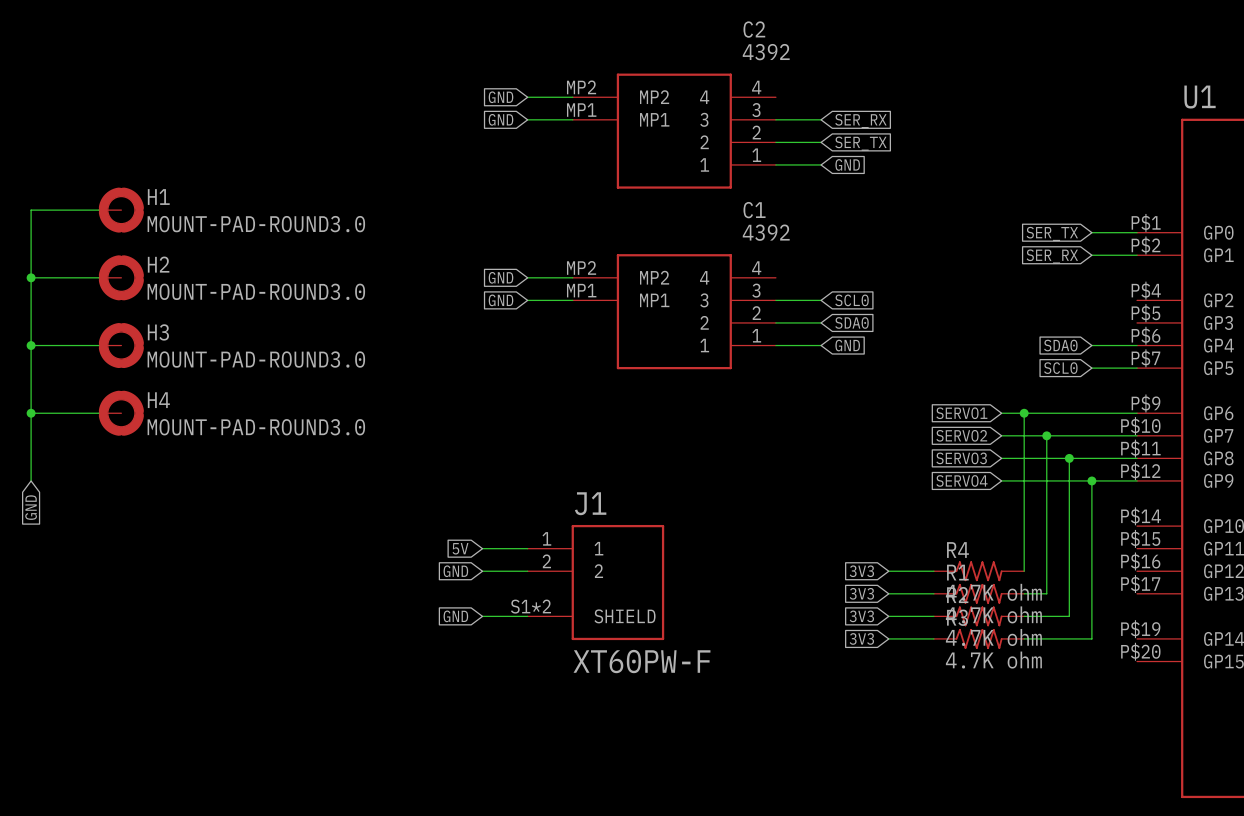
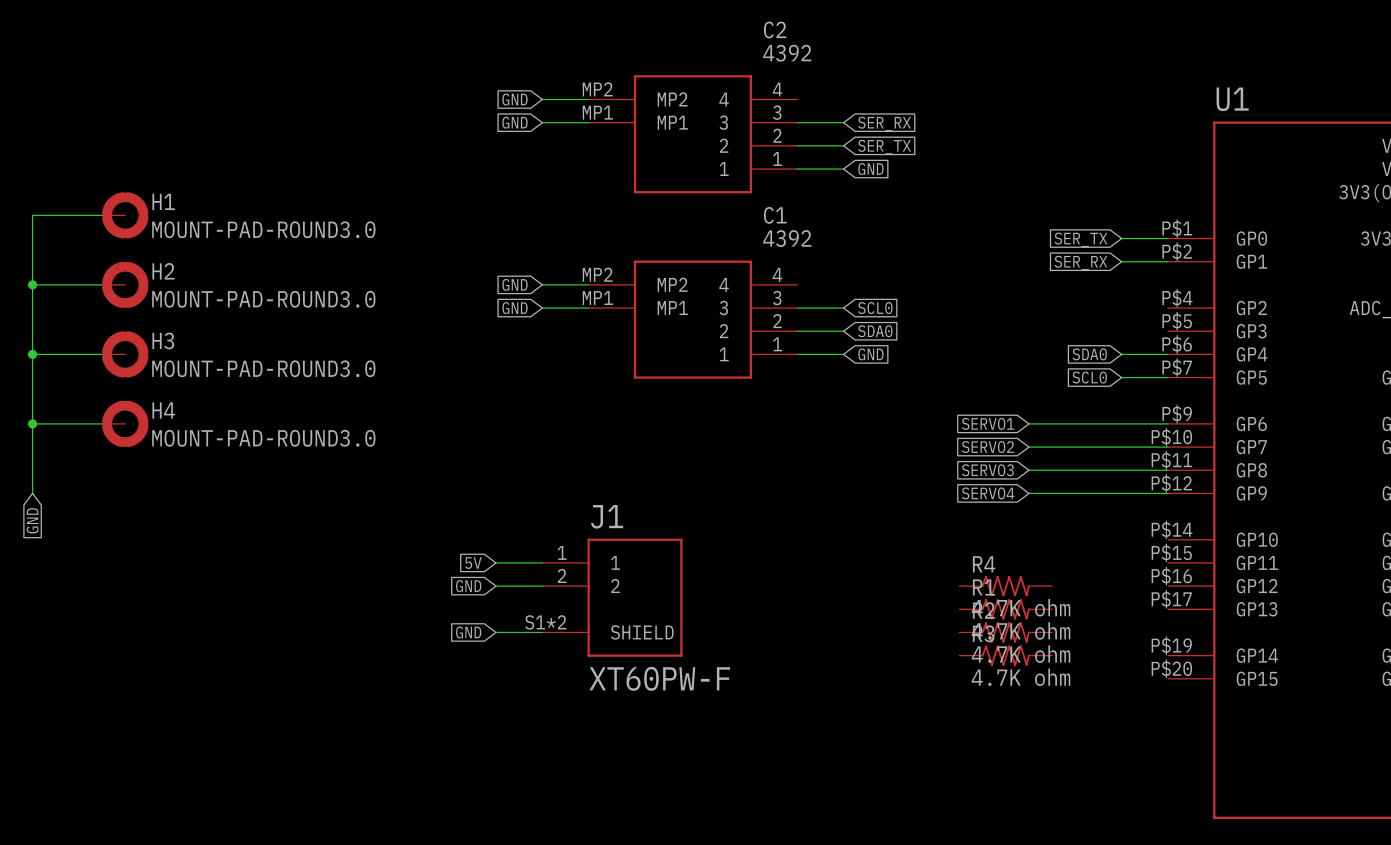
wire: (1024, 413) (1024, 571) -> none
junction: (1024, 413) -> none
wire: (1046, 435) (1046, 593) (1024, 593) -> none
junction: (1046, 435) -> none
wire: (1069, 458) (1069, 616) (1024, 616) -> none
junction: (1069, 458) -> none
wire: (1091, 480) (1091, 638) (1024, 638) -> none
junction: (1091, 480) -> none
global label: 3V3 (861, 571) -> none
wire: (888, 571) (933, 571) -> none
global label: 3V3 (861, 593) -> none
wire: (888, 593) (933, 593) -> none
global label: 3V3 (861, 616) -> none
wire: (888, 616) (933, 616) -> none
global label: 3V3 (861, 638) -> none
wire: (888, 638) (933, 638) -> none

